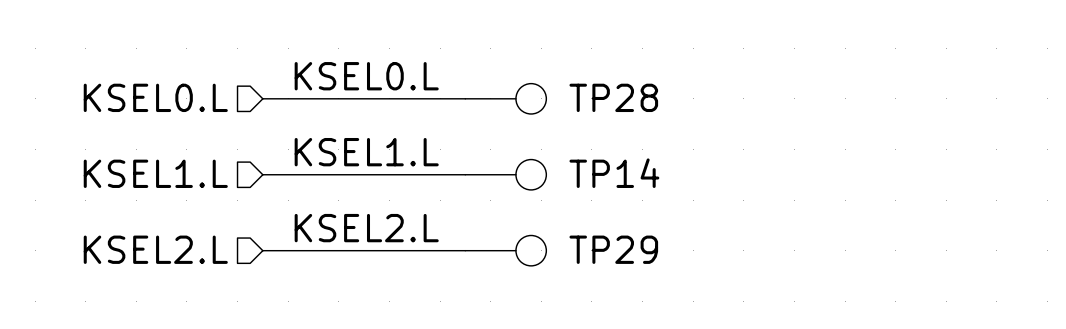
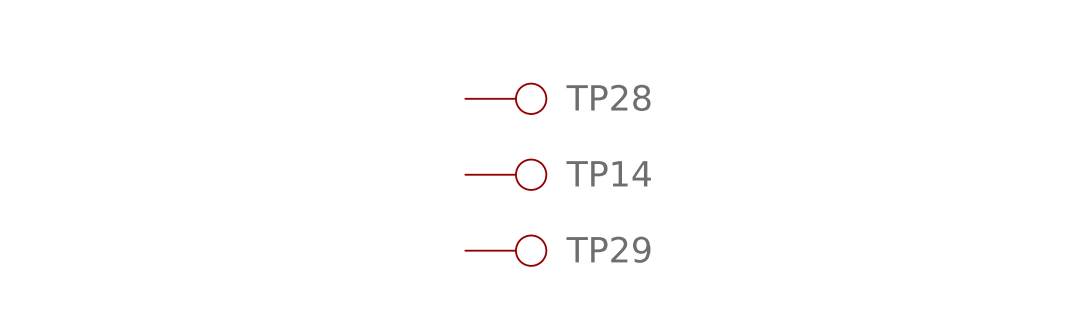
label: KSEL0.L (366, 76) -> none
hierarchical label: KSEL0.L (155, 97) -> none
wire: (262, 98) (465, 98) -> none
label: KSEL1.L (366, 152) -> none
hierarchical label: KSEL1.L (155, 173) -> none
wire: (262, 174) (465, 174) -> none
label: KSEL2.L (366, 228) -> none
hierarchical label: KSEL2.L (155, 249) -> none
wire: (262, 250) (465, 250) -> none

